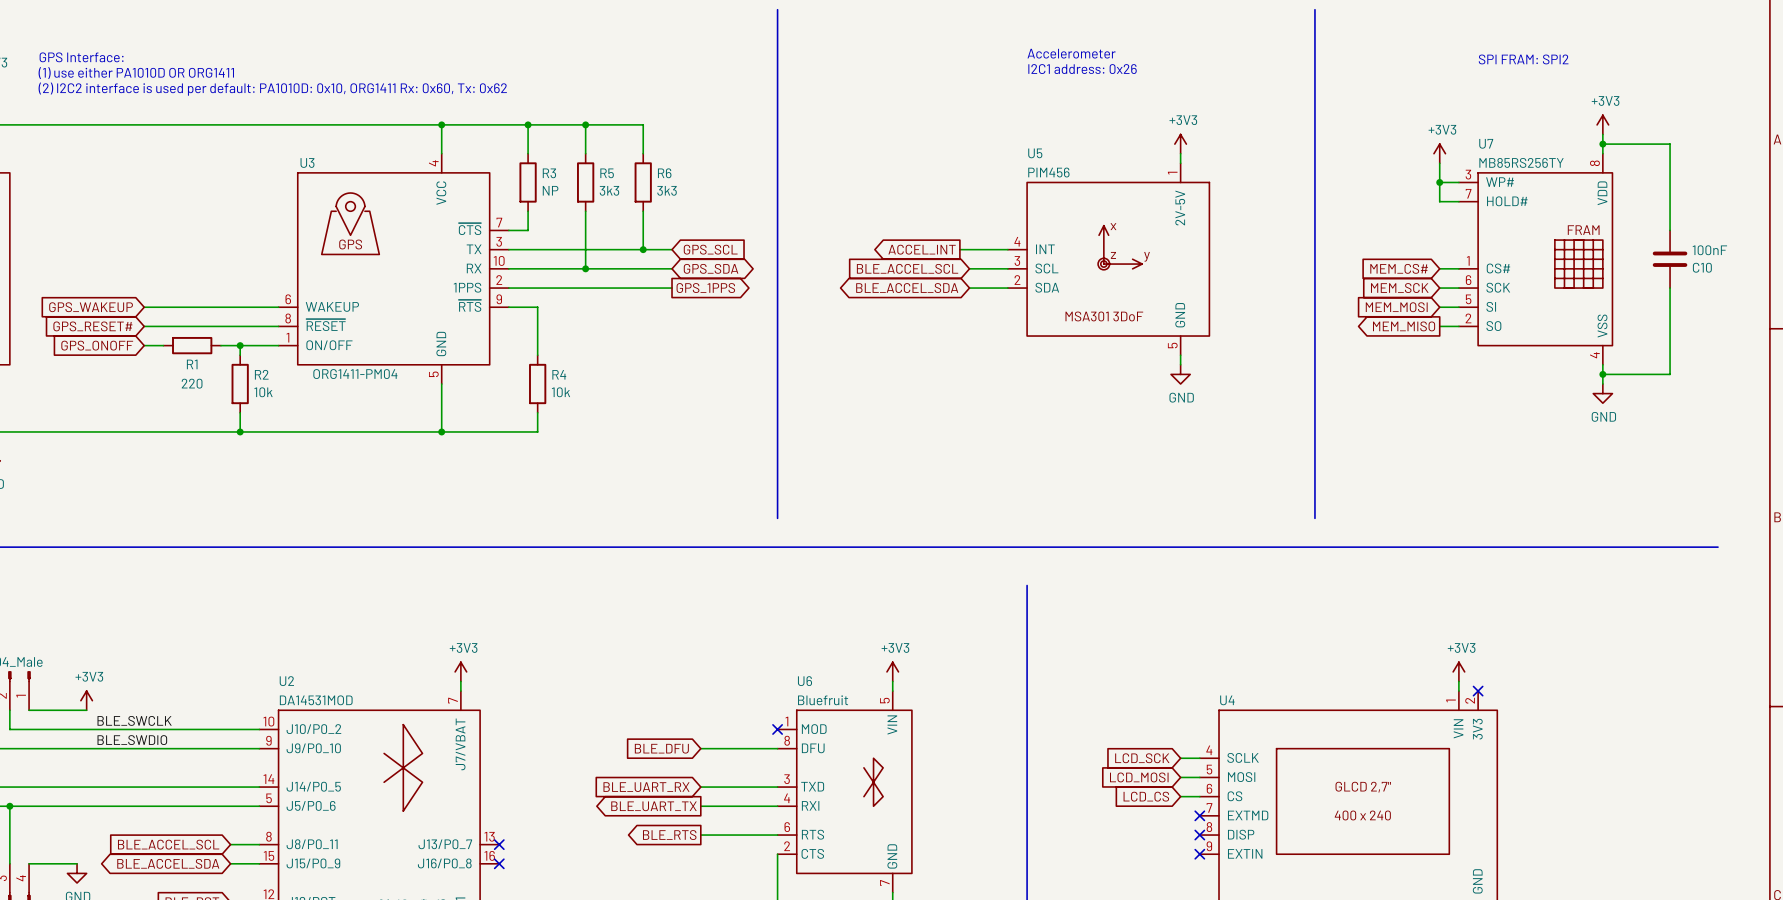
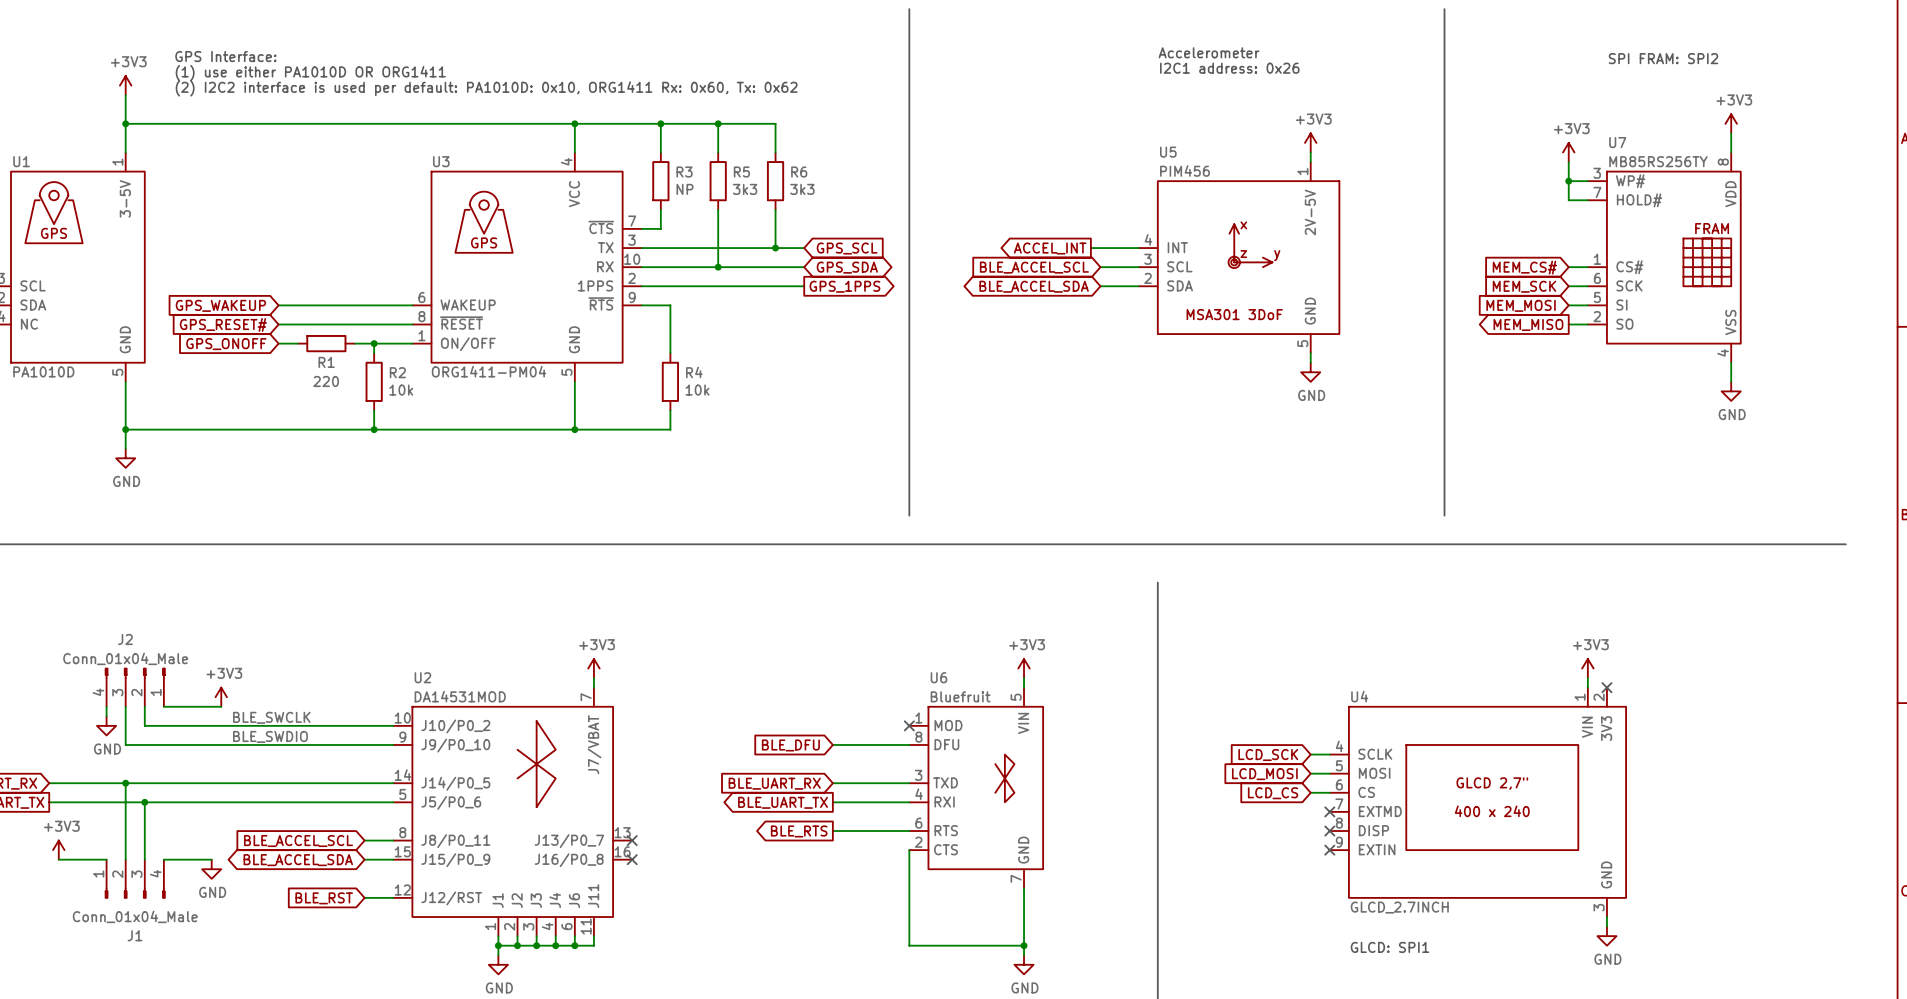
wire: (1602, 144) (1670, 144) (1670, 230) -> none
junction: (1602, 144) -> none
C10: 100nF (1670, 259) -> none
wire: (1670, 288) (1670, 374) (1602, 374) -> none
junction: (1602, 374) -> none

